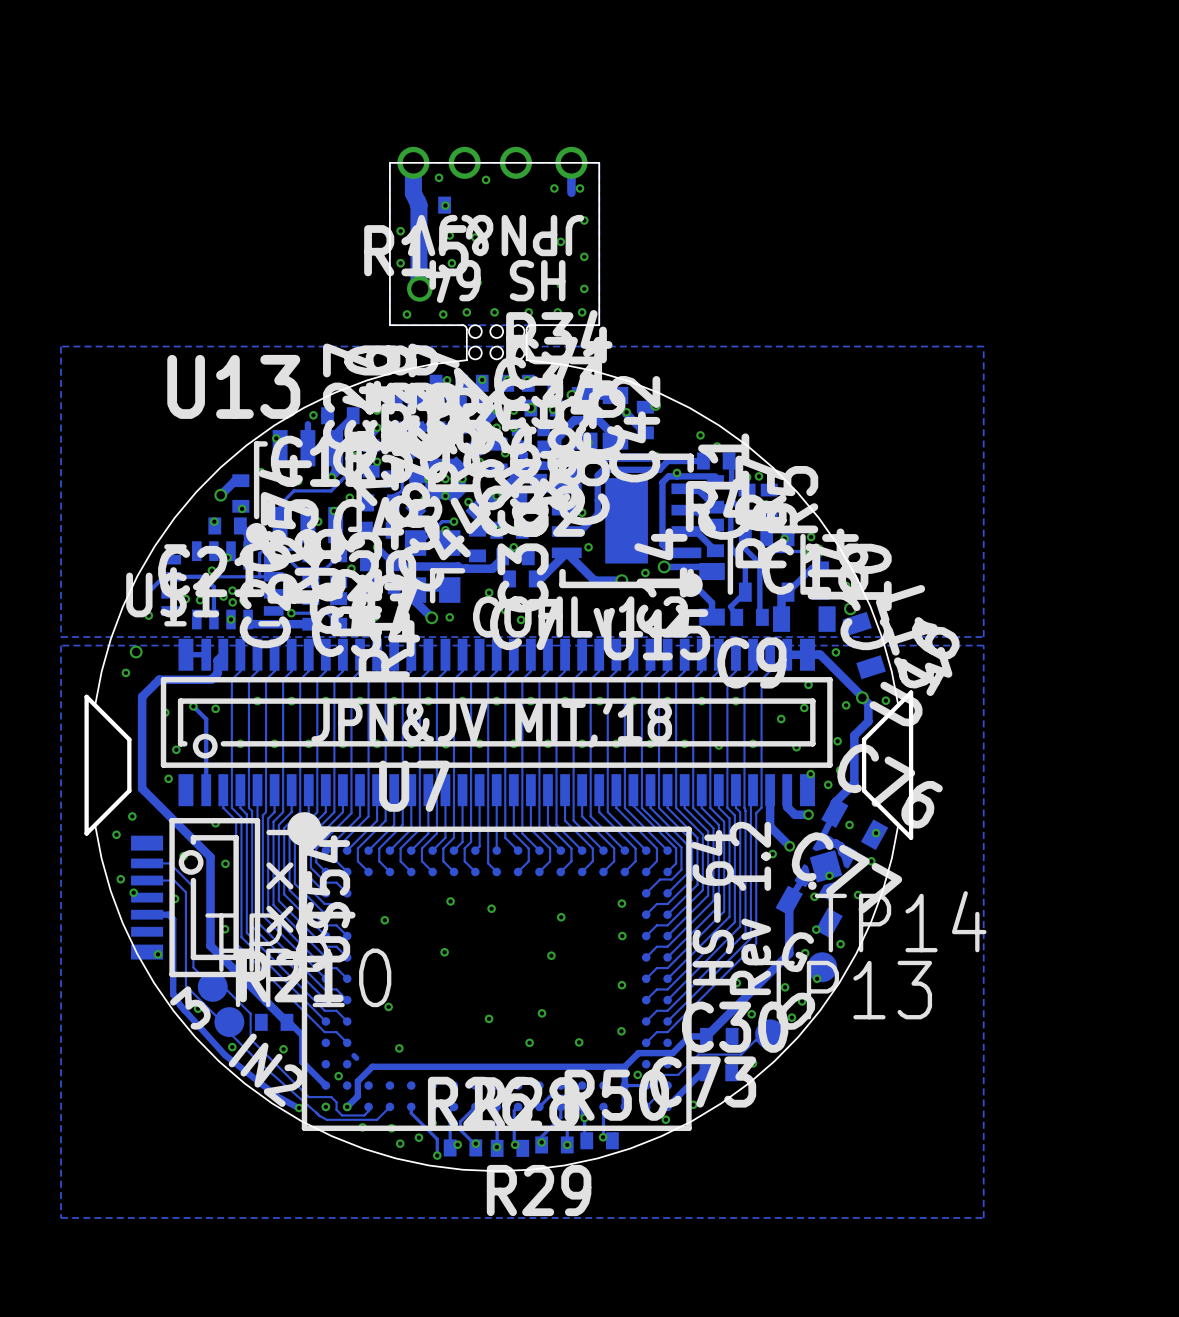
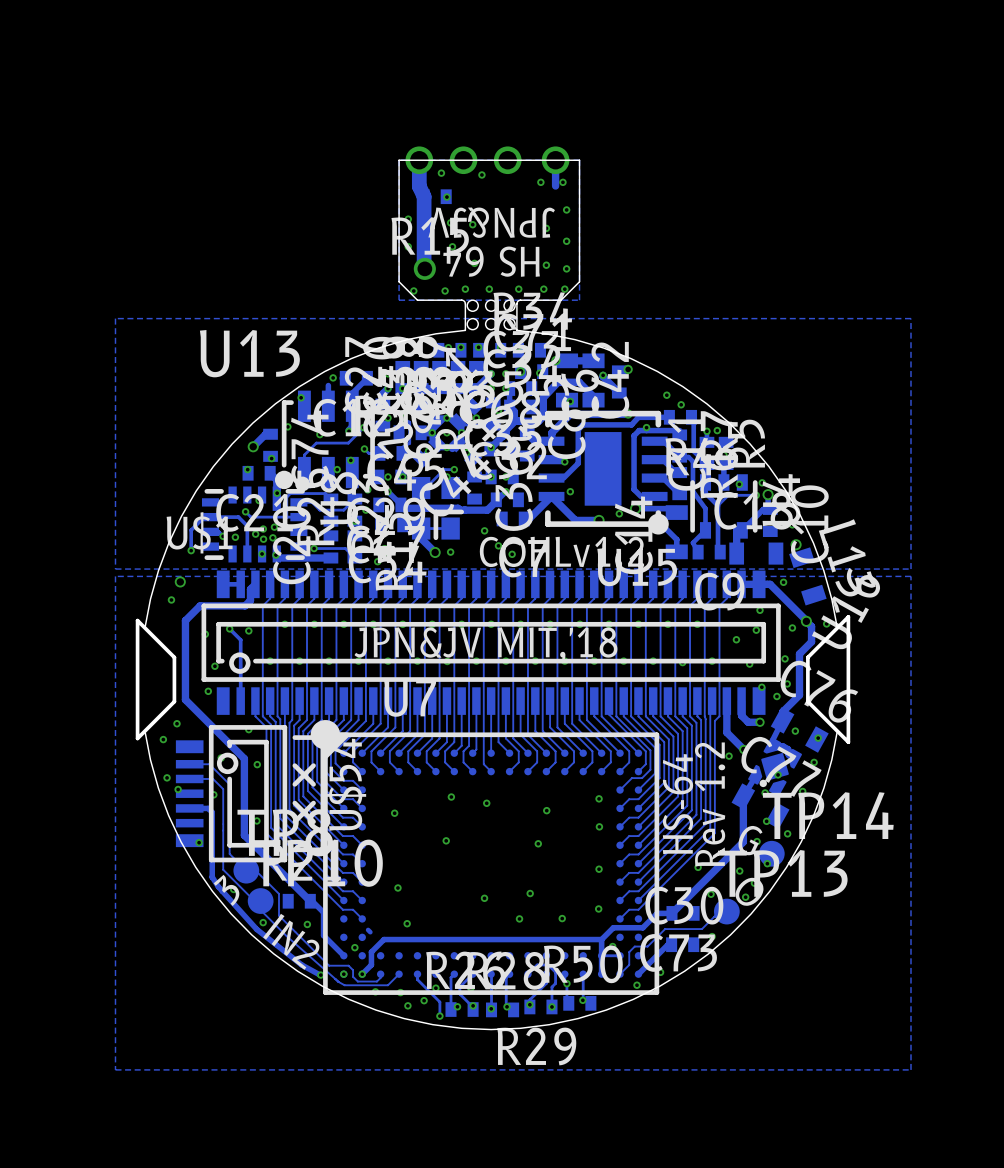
board edge: (389, 303) (389, 325) (411, 325) -> (399, 281) (417, 300)
board edge: (599, 303) (599, 325) (577, 325) -> (579, 281) (561, 300)

